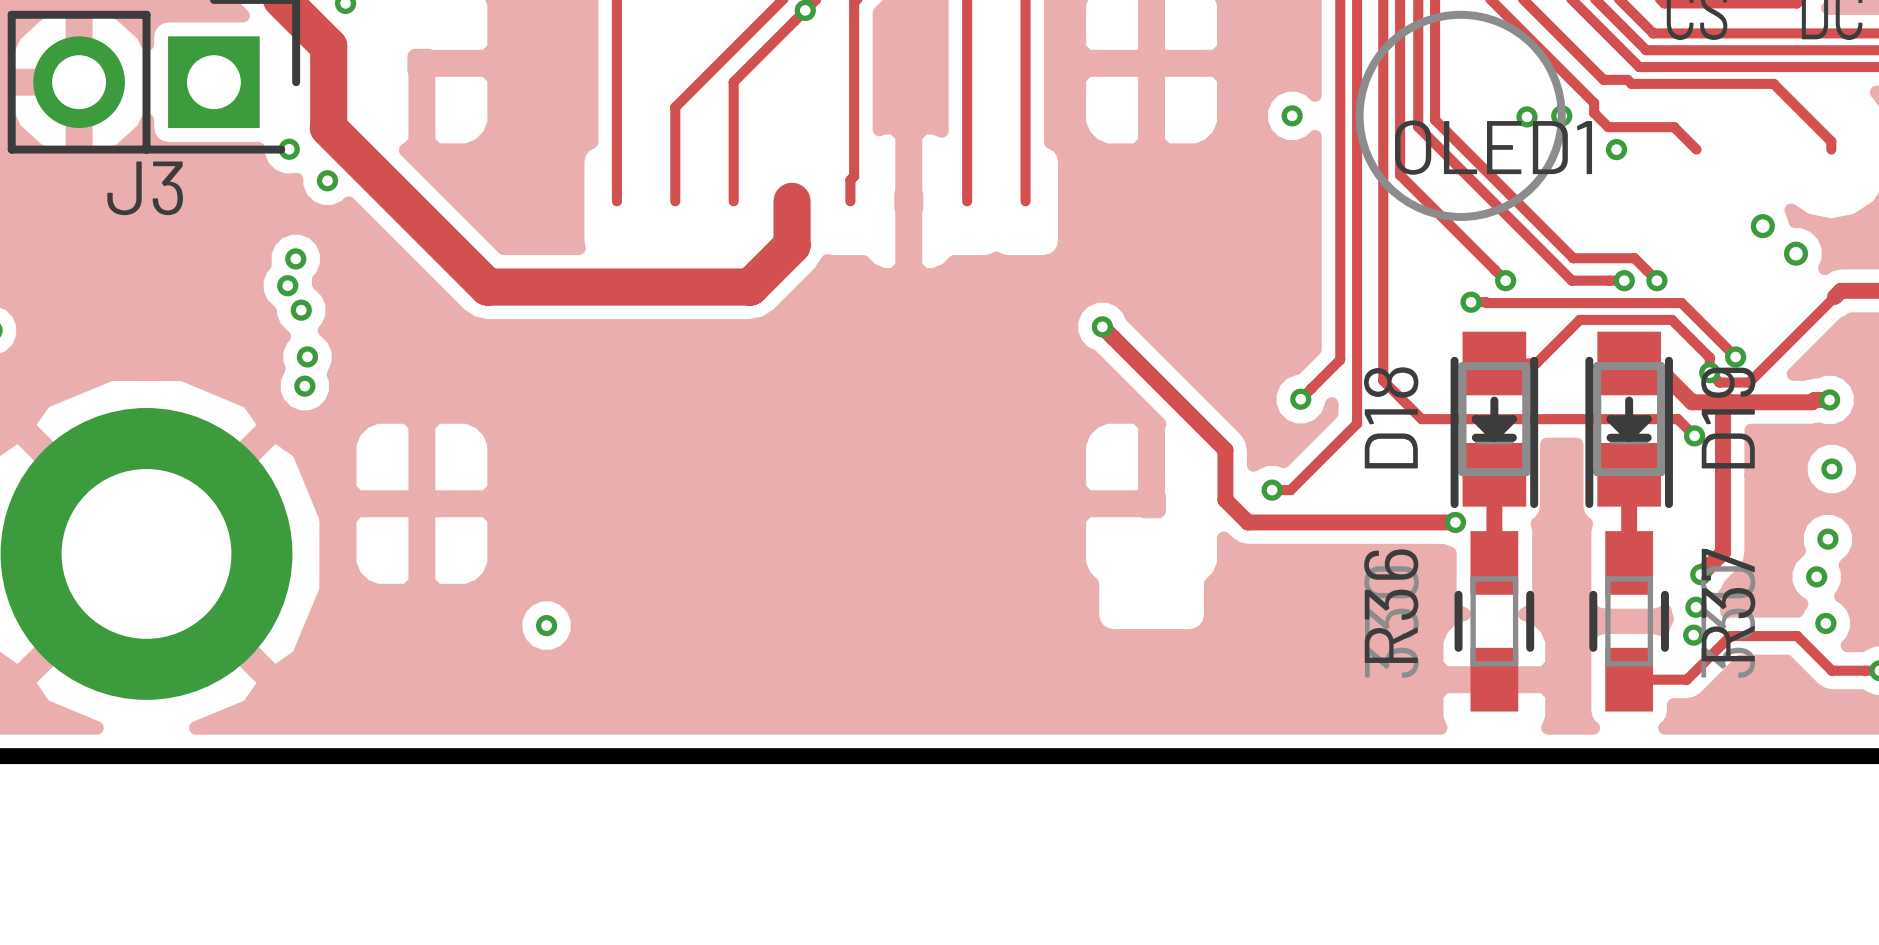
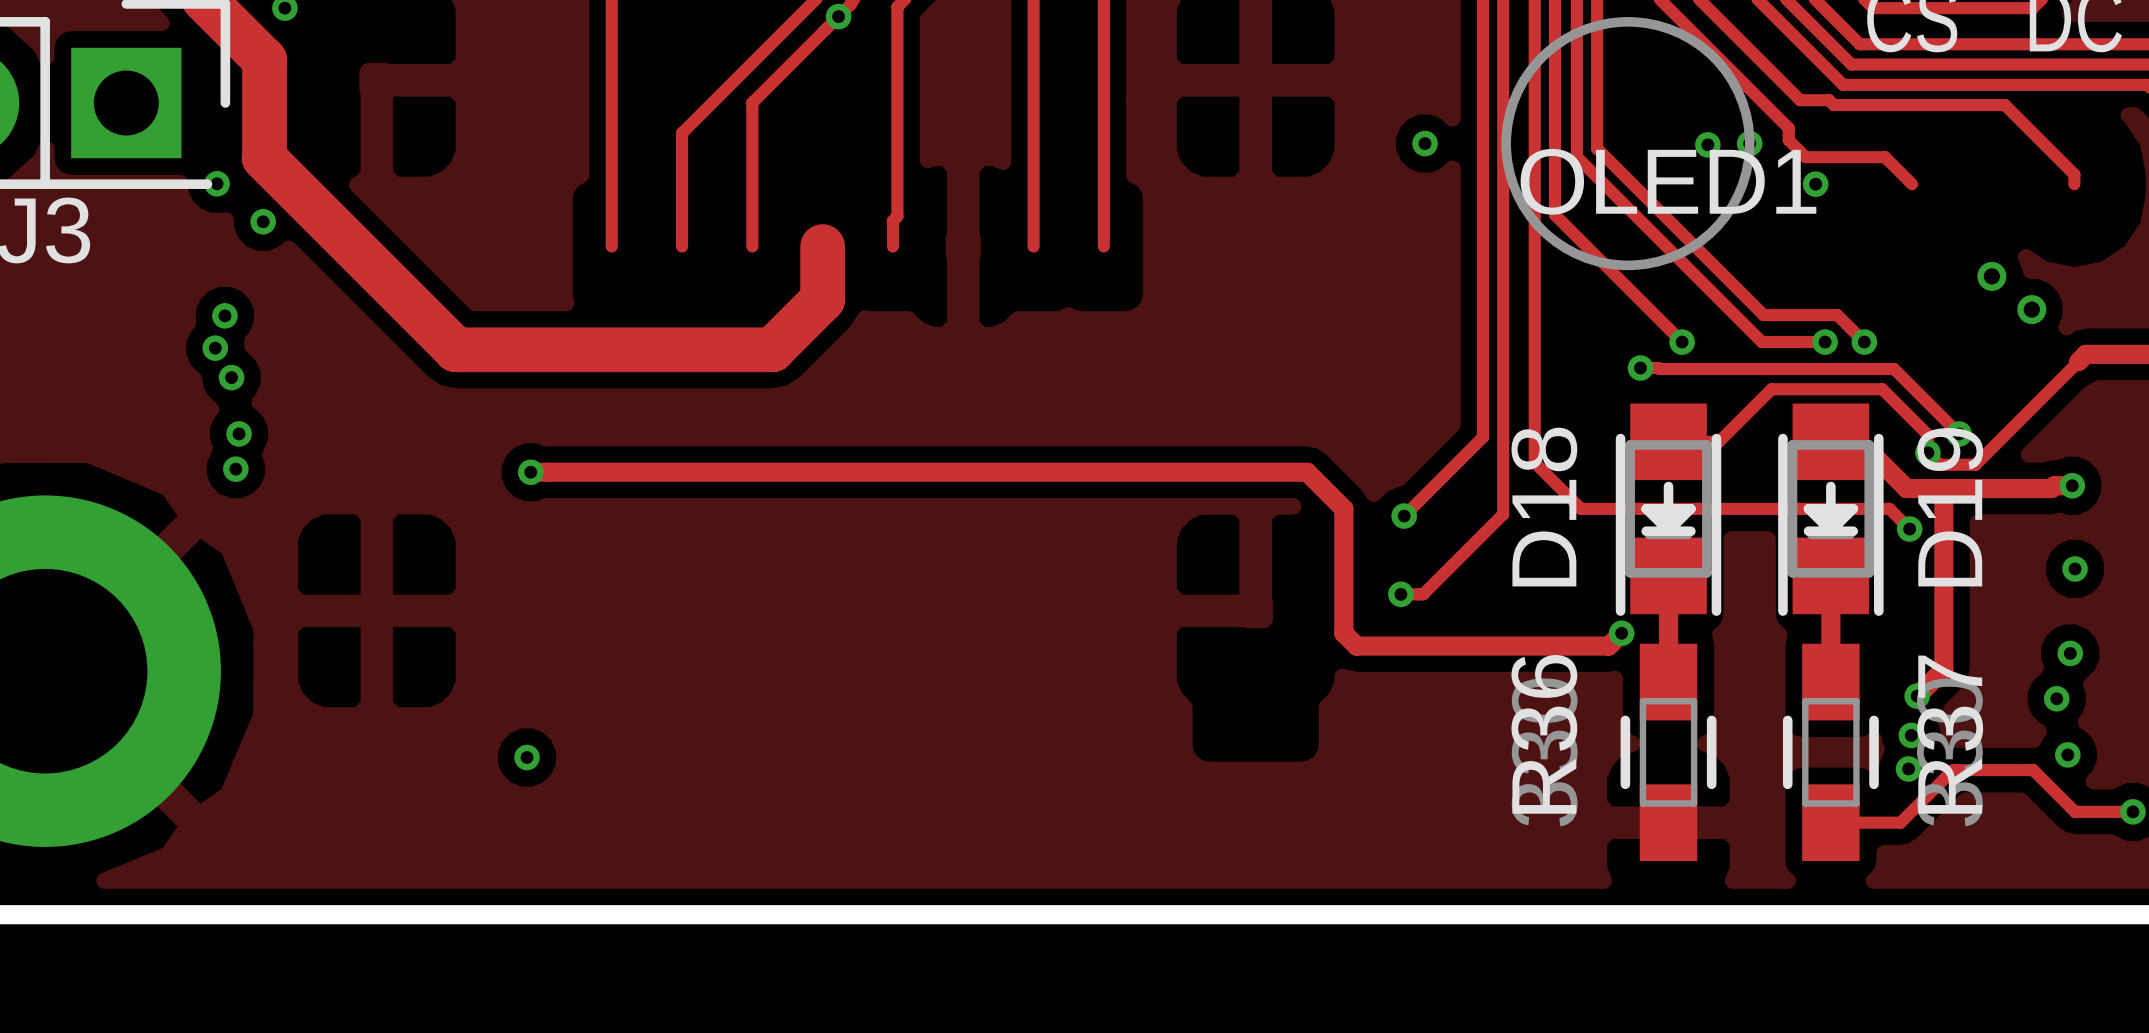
track: (1102, 326) (1225, 449) (1225, 500) (1247, 522) (1455, 522) -> (530, 472) (1307, 472) (1343, 508) (1343, 633) (1356, 646) (1608, 646) (1621, 633)
via: (1102, 326) -> none
via: none -> (530, 472)
track: none -> (1435, 484) (1404, 516)
via position: (1300, 399) -> (1404, 516)

